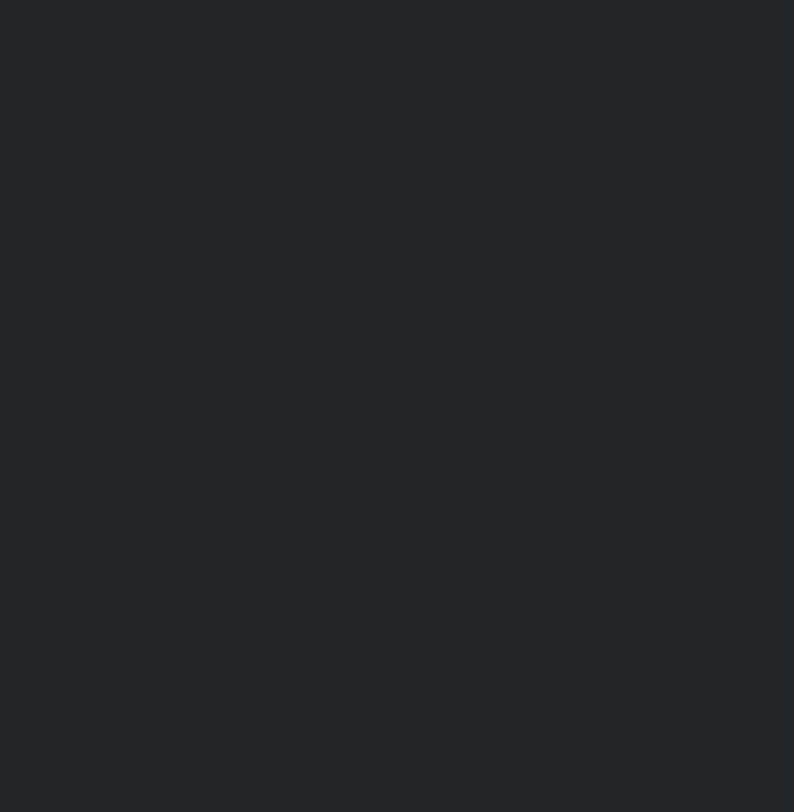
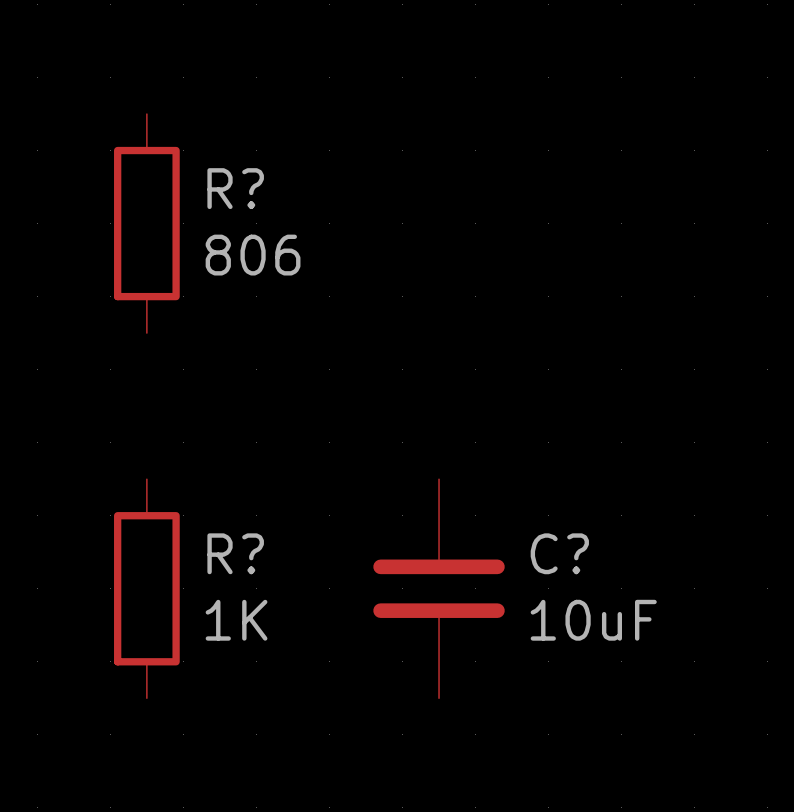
R?: none -> 806 (146, 223)
R?: none -> 1K (146, 588)
C?: none -> 10uF (439, 588)

